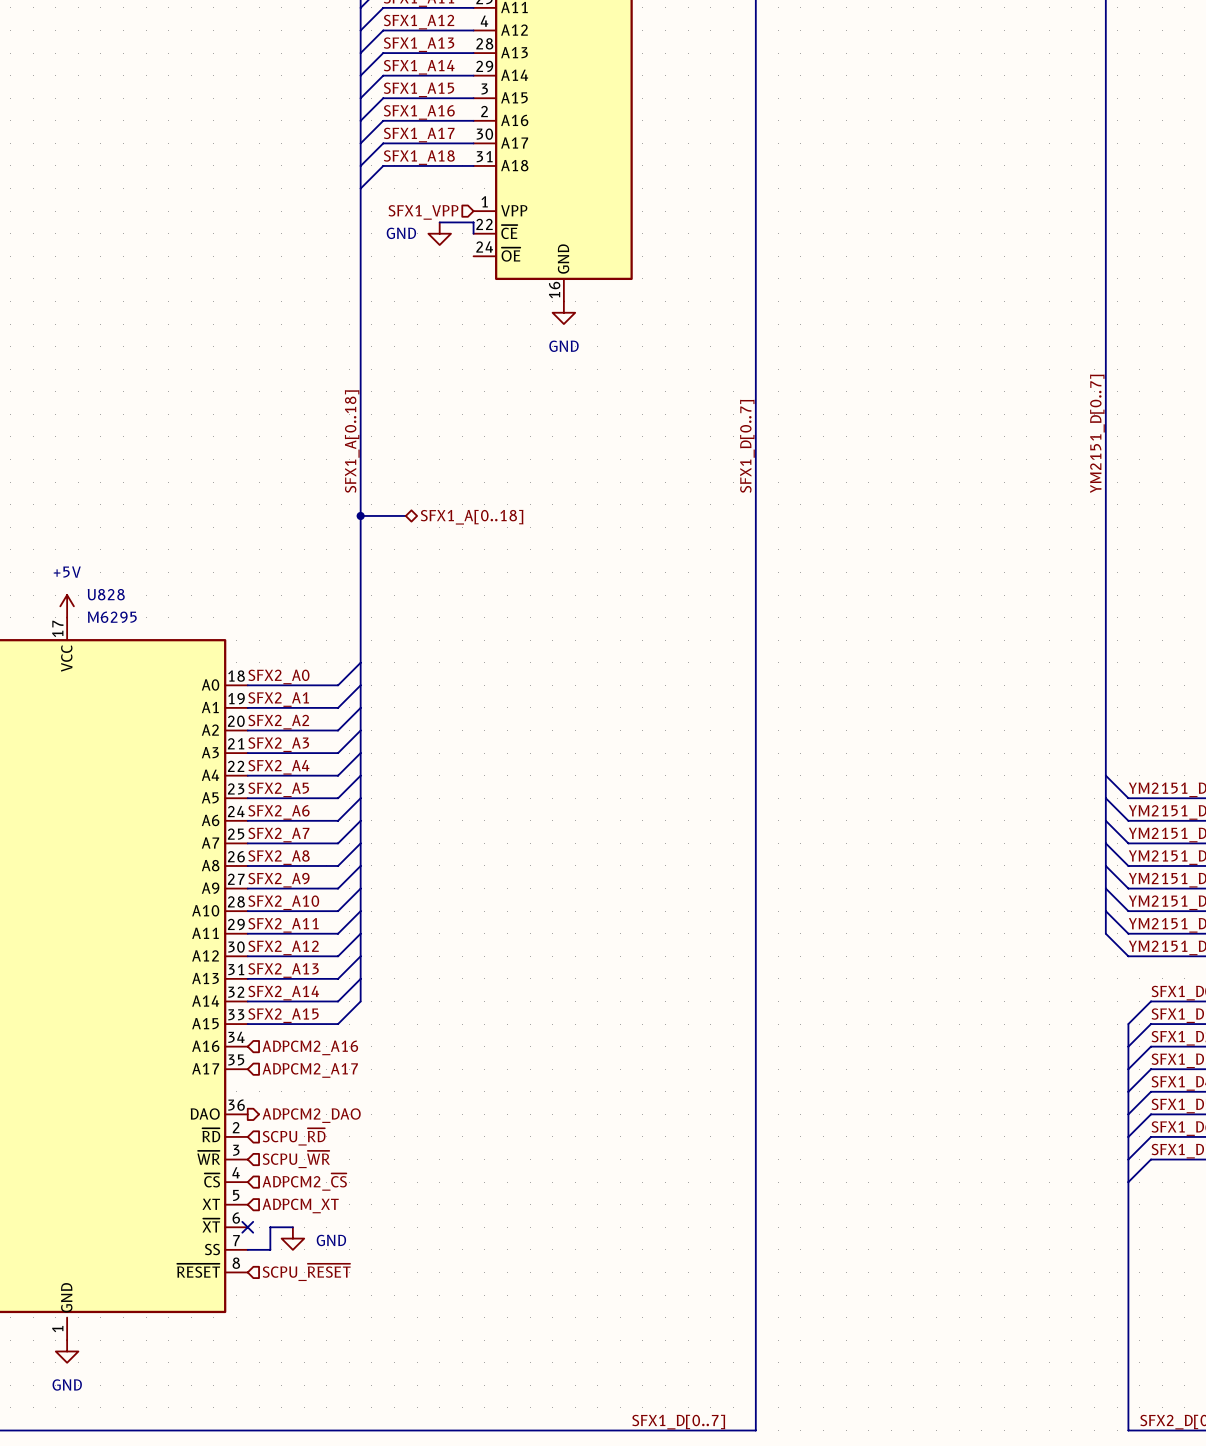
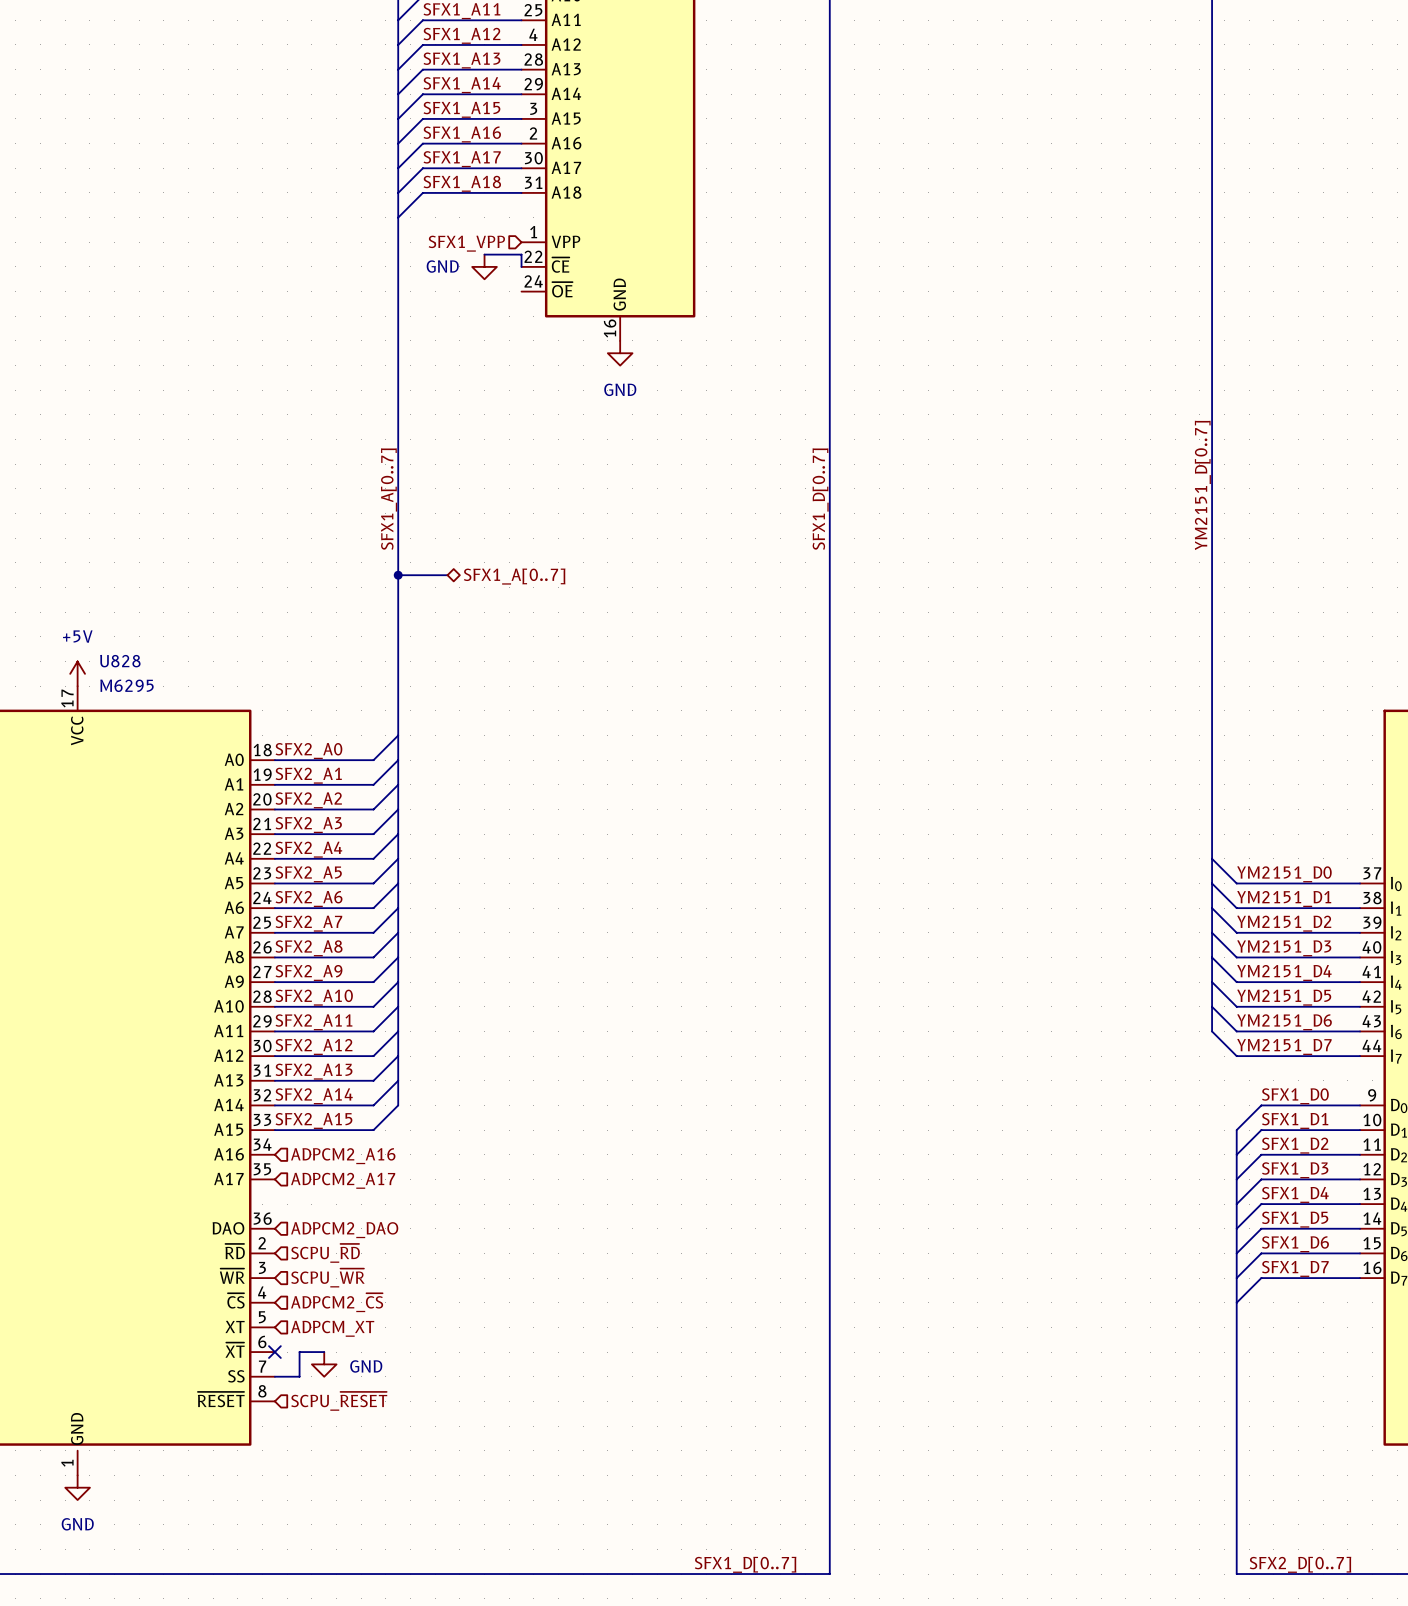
label: SFX1_A[0..18] (352, 441) -> SFX1_A[0..7] (389, 499)
hierarchical label: SFX1_A[0..18] (472, 517) -> SFX1_A[0..7] (514, 576)
hierarchical label shape: output (311, 1115) -> input (344, 1230)

